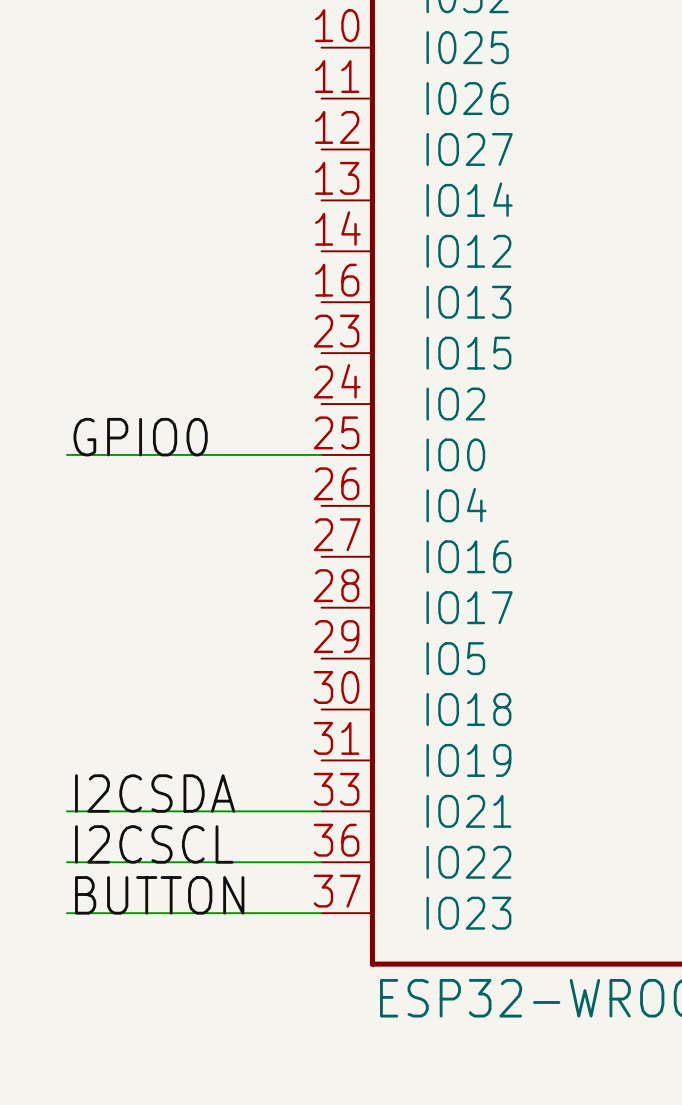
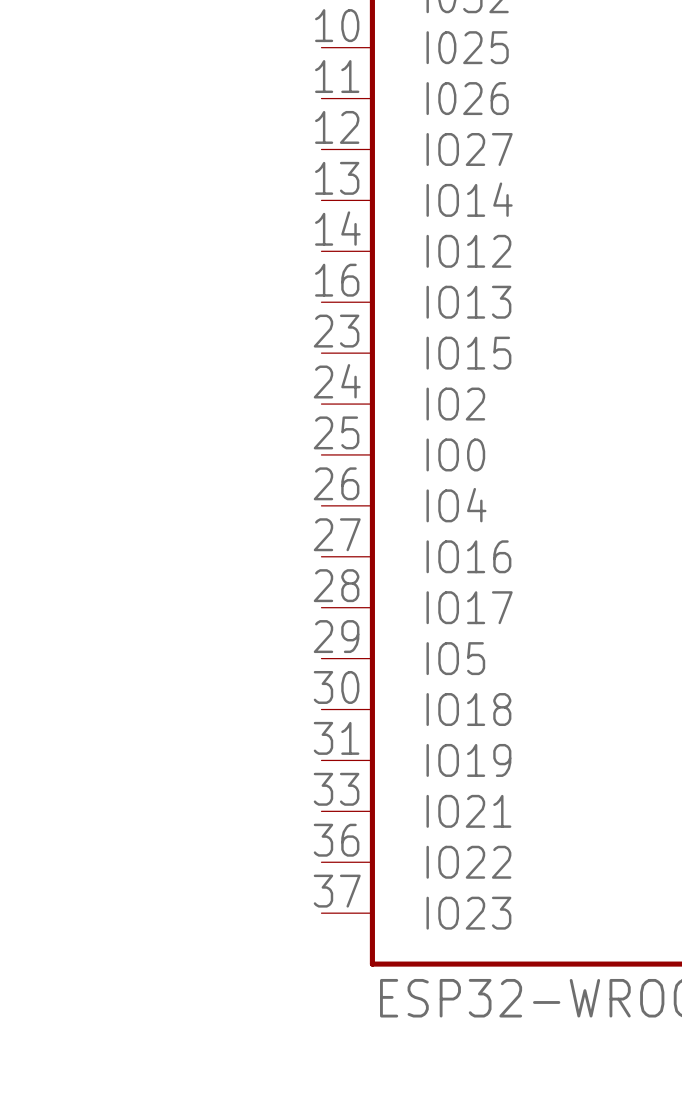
label: GPIO0 (140, 437) -> none
wire: (66, 454) (321, 454) -> none
label: I2CSDA (155, 793) -> none
wire: (66, 811) (321, 811) -> none
label: I2CSCL (154, 844) -> none
wire: (66, 862) (321, 862) -> none
label: BUTTON (159, 895) -> none
wire: (66, 913) (321, 913) -> none

